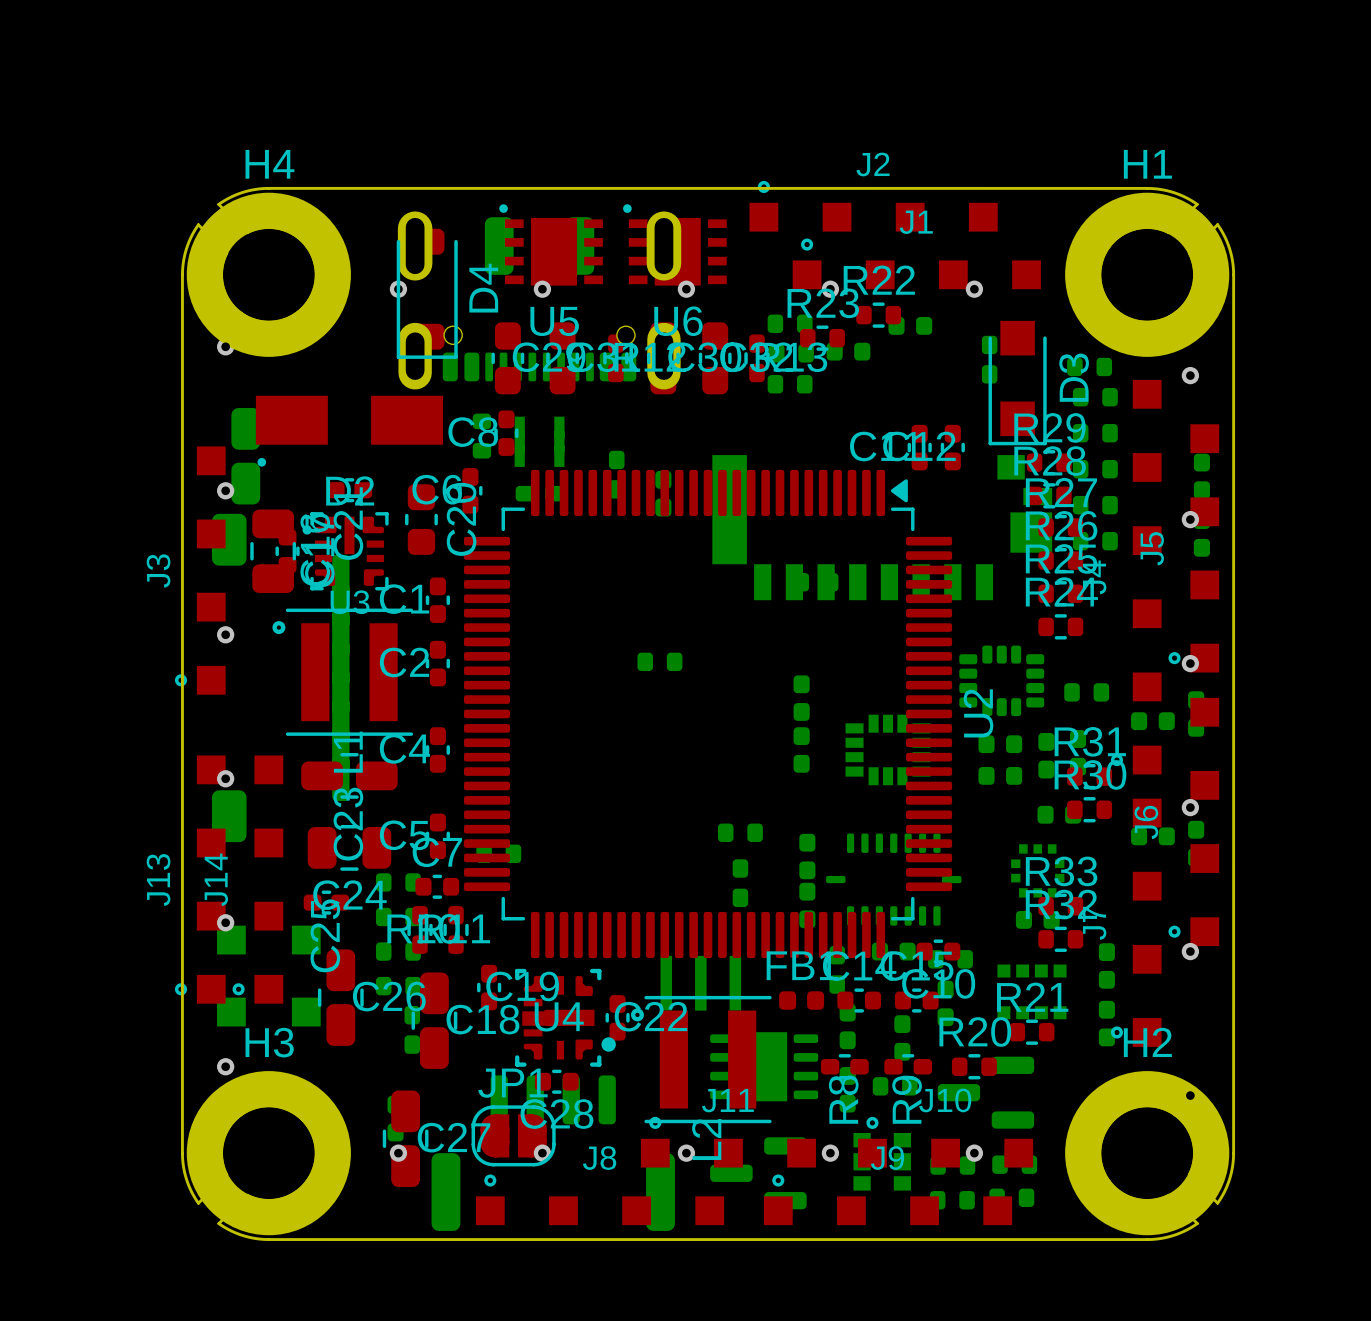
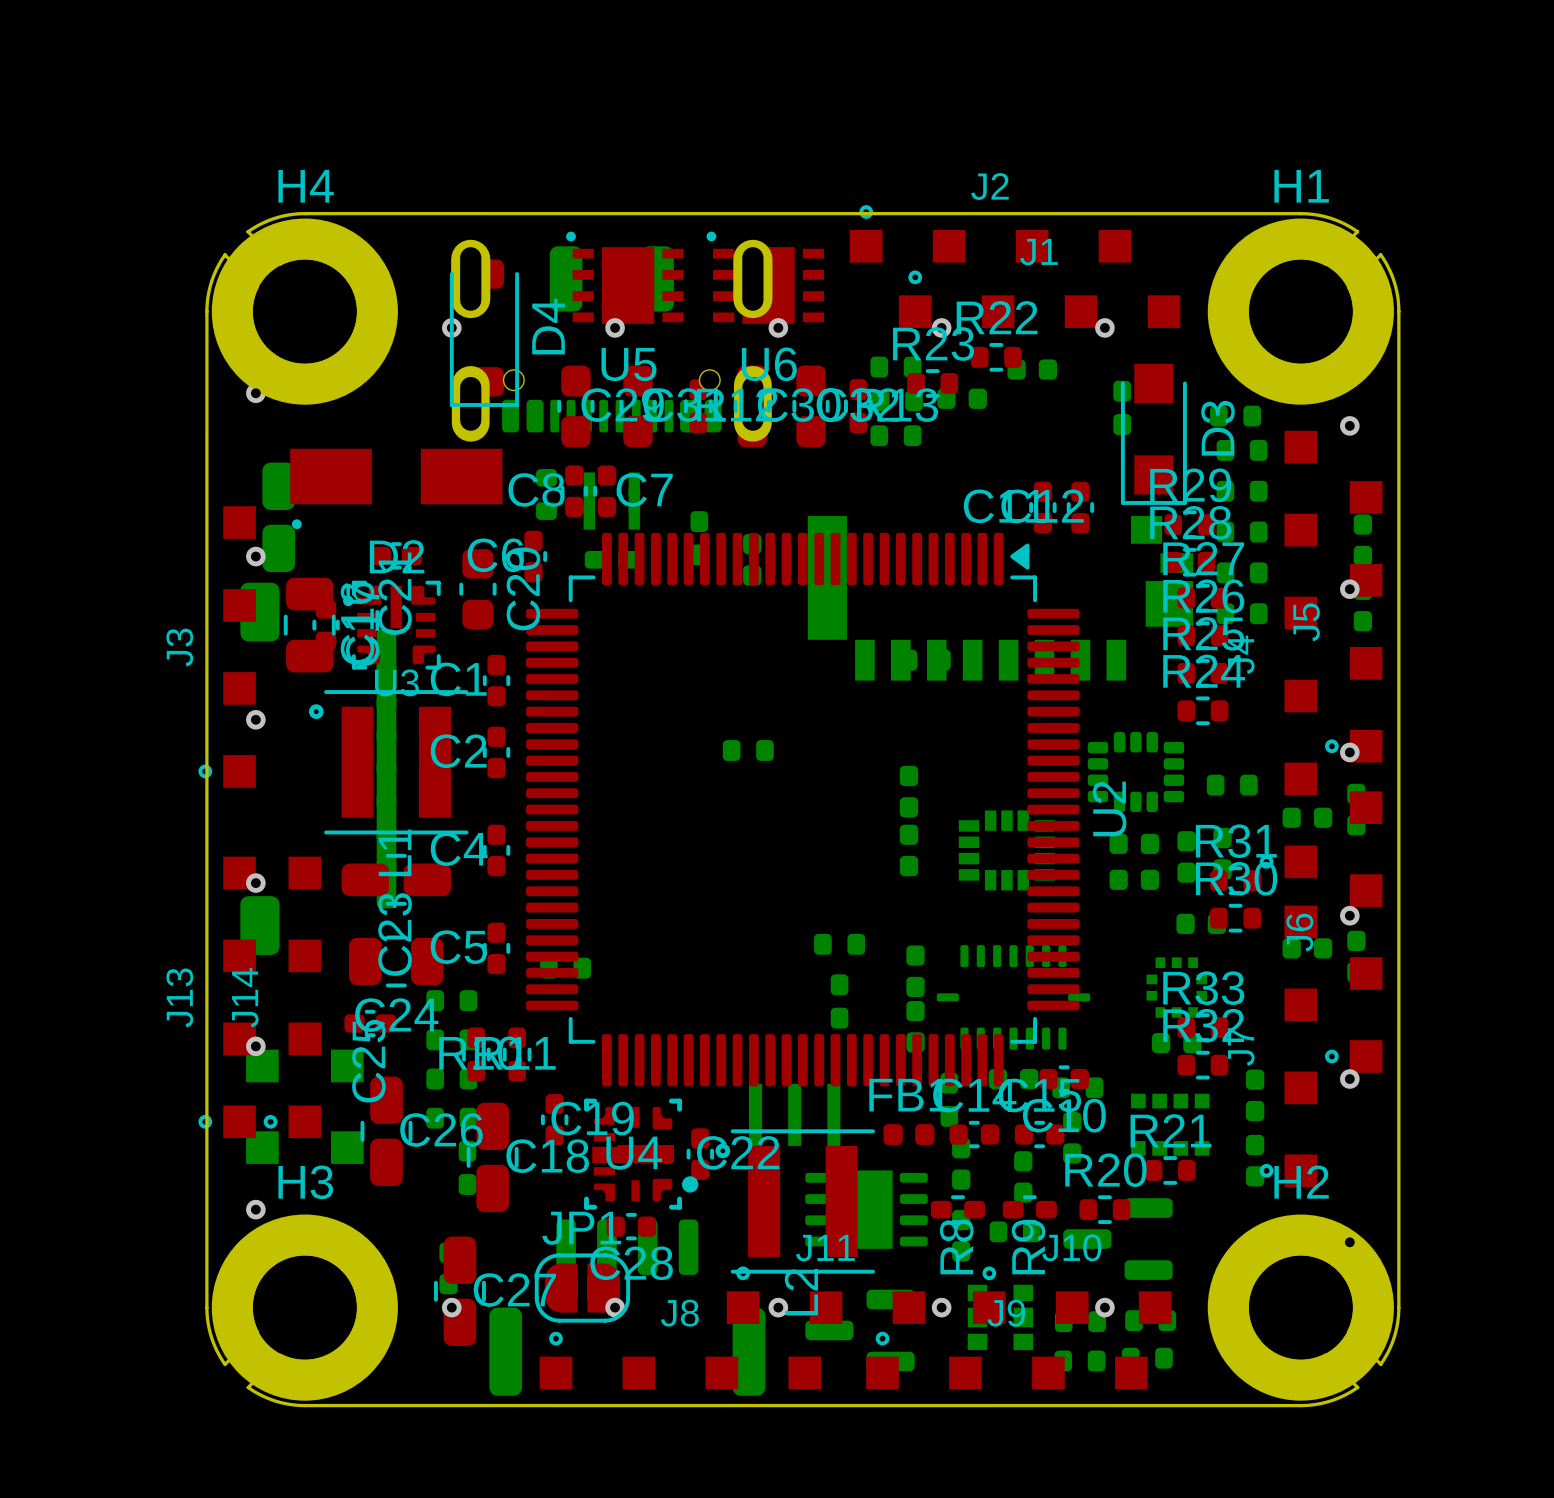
C7 footprint: [415, 874, 460, 899] -> [593, 465, 621, 518]

